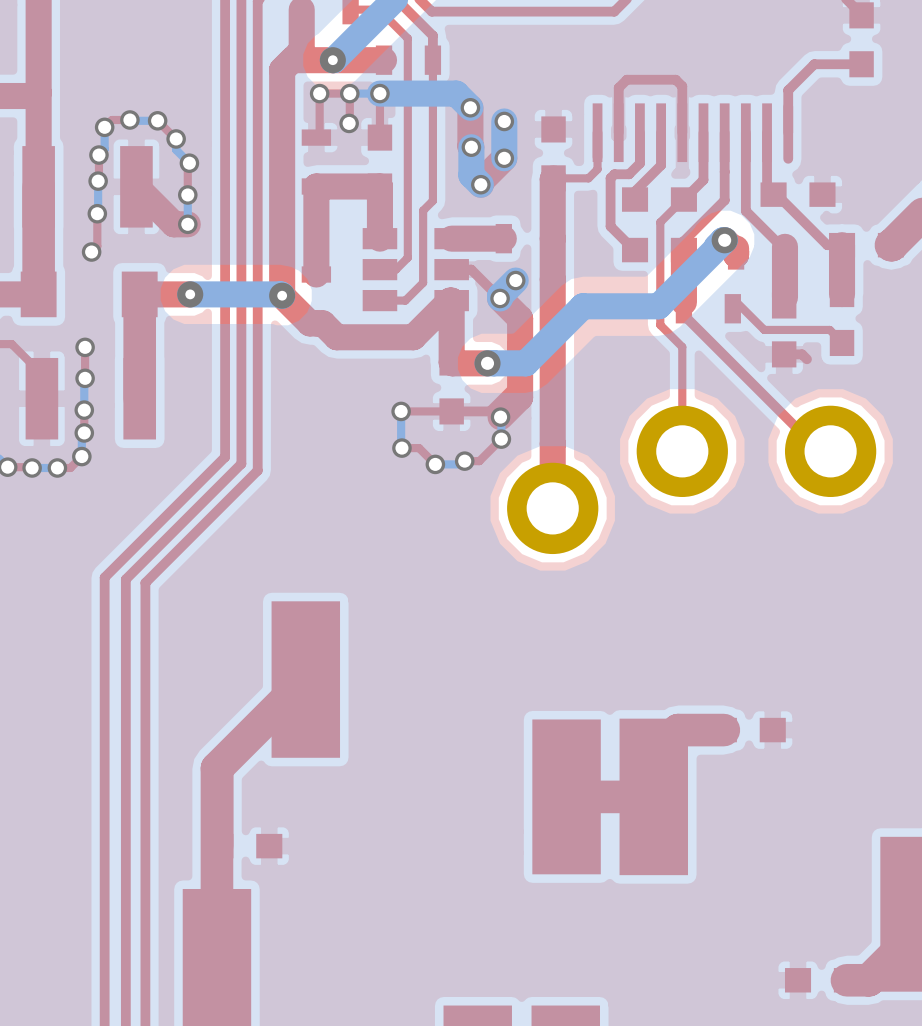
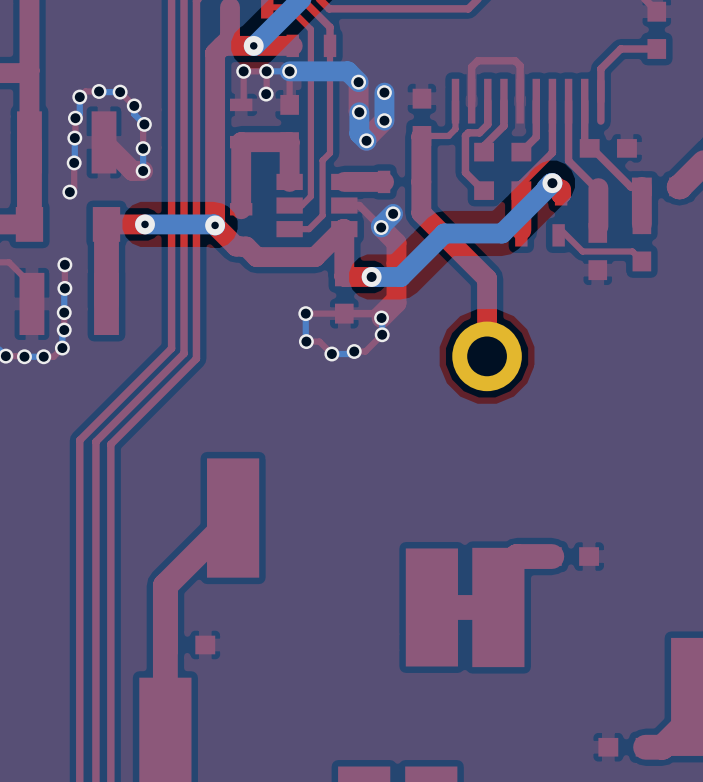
top track: (683, 199) (660, 222) (660, 325) (682, 347) (682, 451) -> none
top track: (552, 279) (552, 508) -> (421, 212) (487, 278) (487, 356)
top track: (683, 315) (820, 451) (830, 451) -> none
top track: (784, 354) (802, 354) (806, 359) -> none
part position: (682, 451) -> (487, 356)
part: (830, 451) -> none
part: (552, 508) -> none

